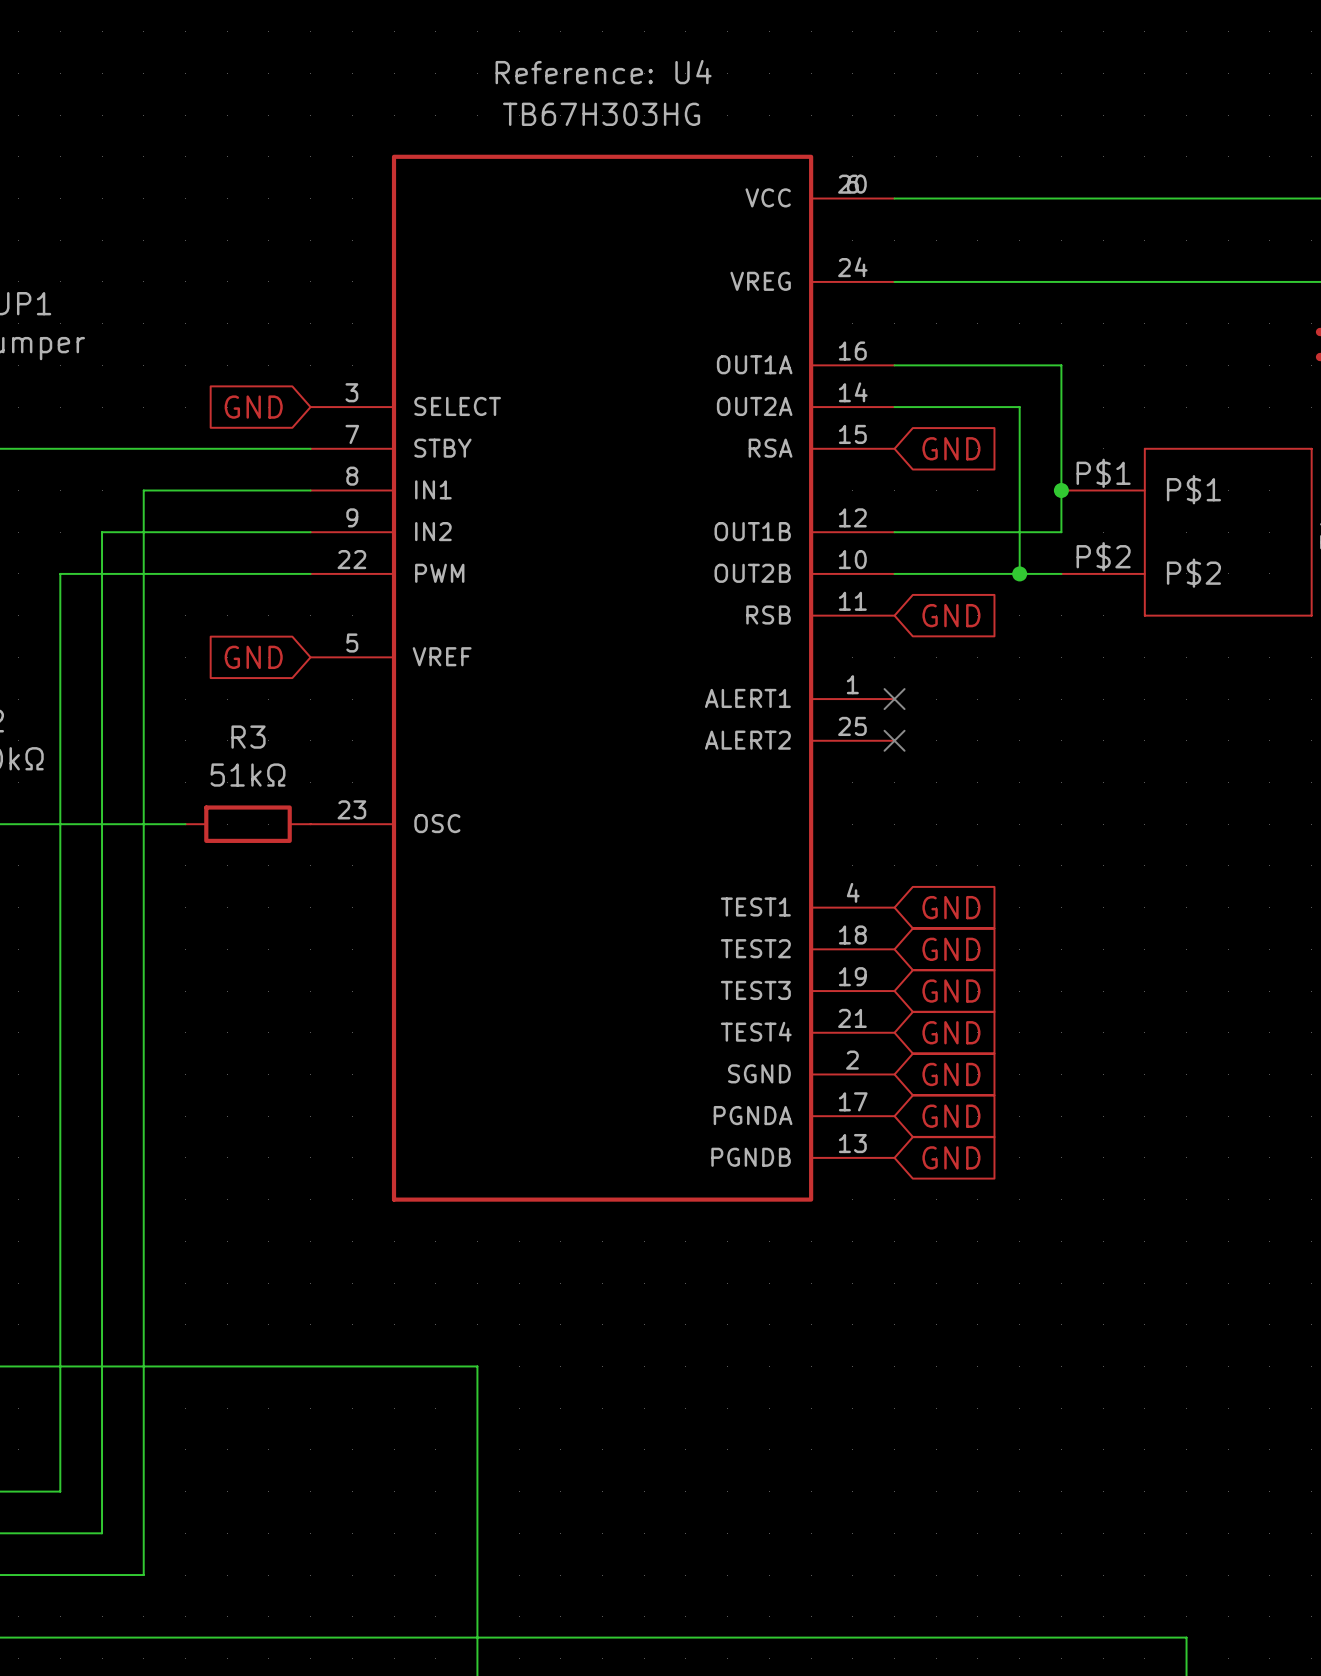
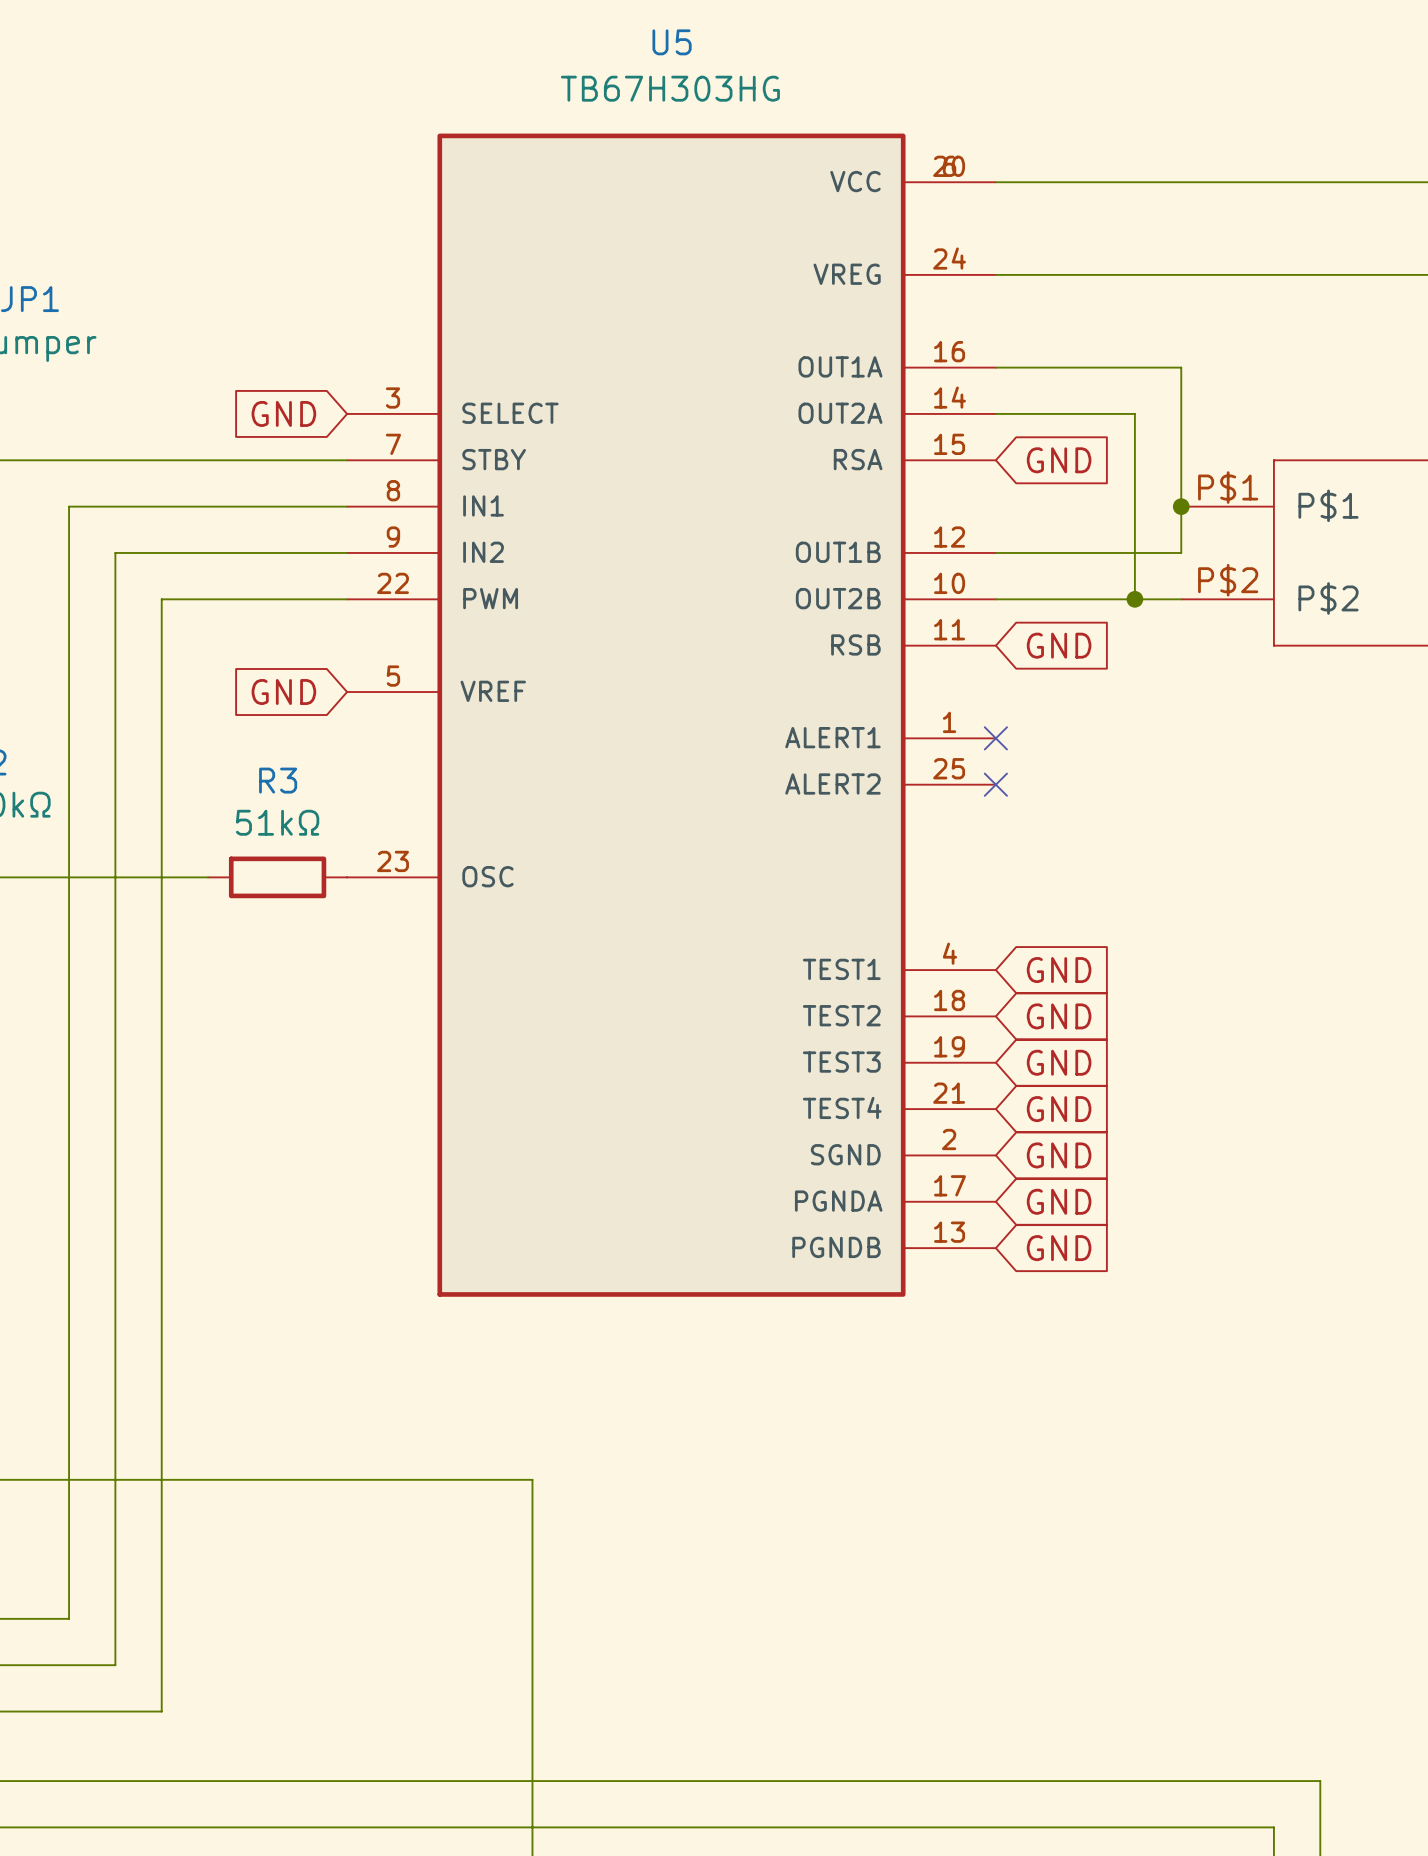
U5 name: Reference: U4 (603, 72) -> U5 (672, 42)
wire: (143, 490) (143, 573) (60, 573) -> (161, 506) (69, 506) (69, 599)

